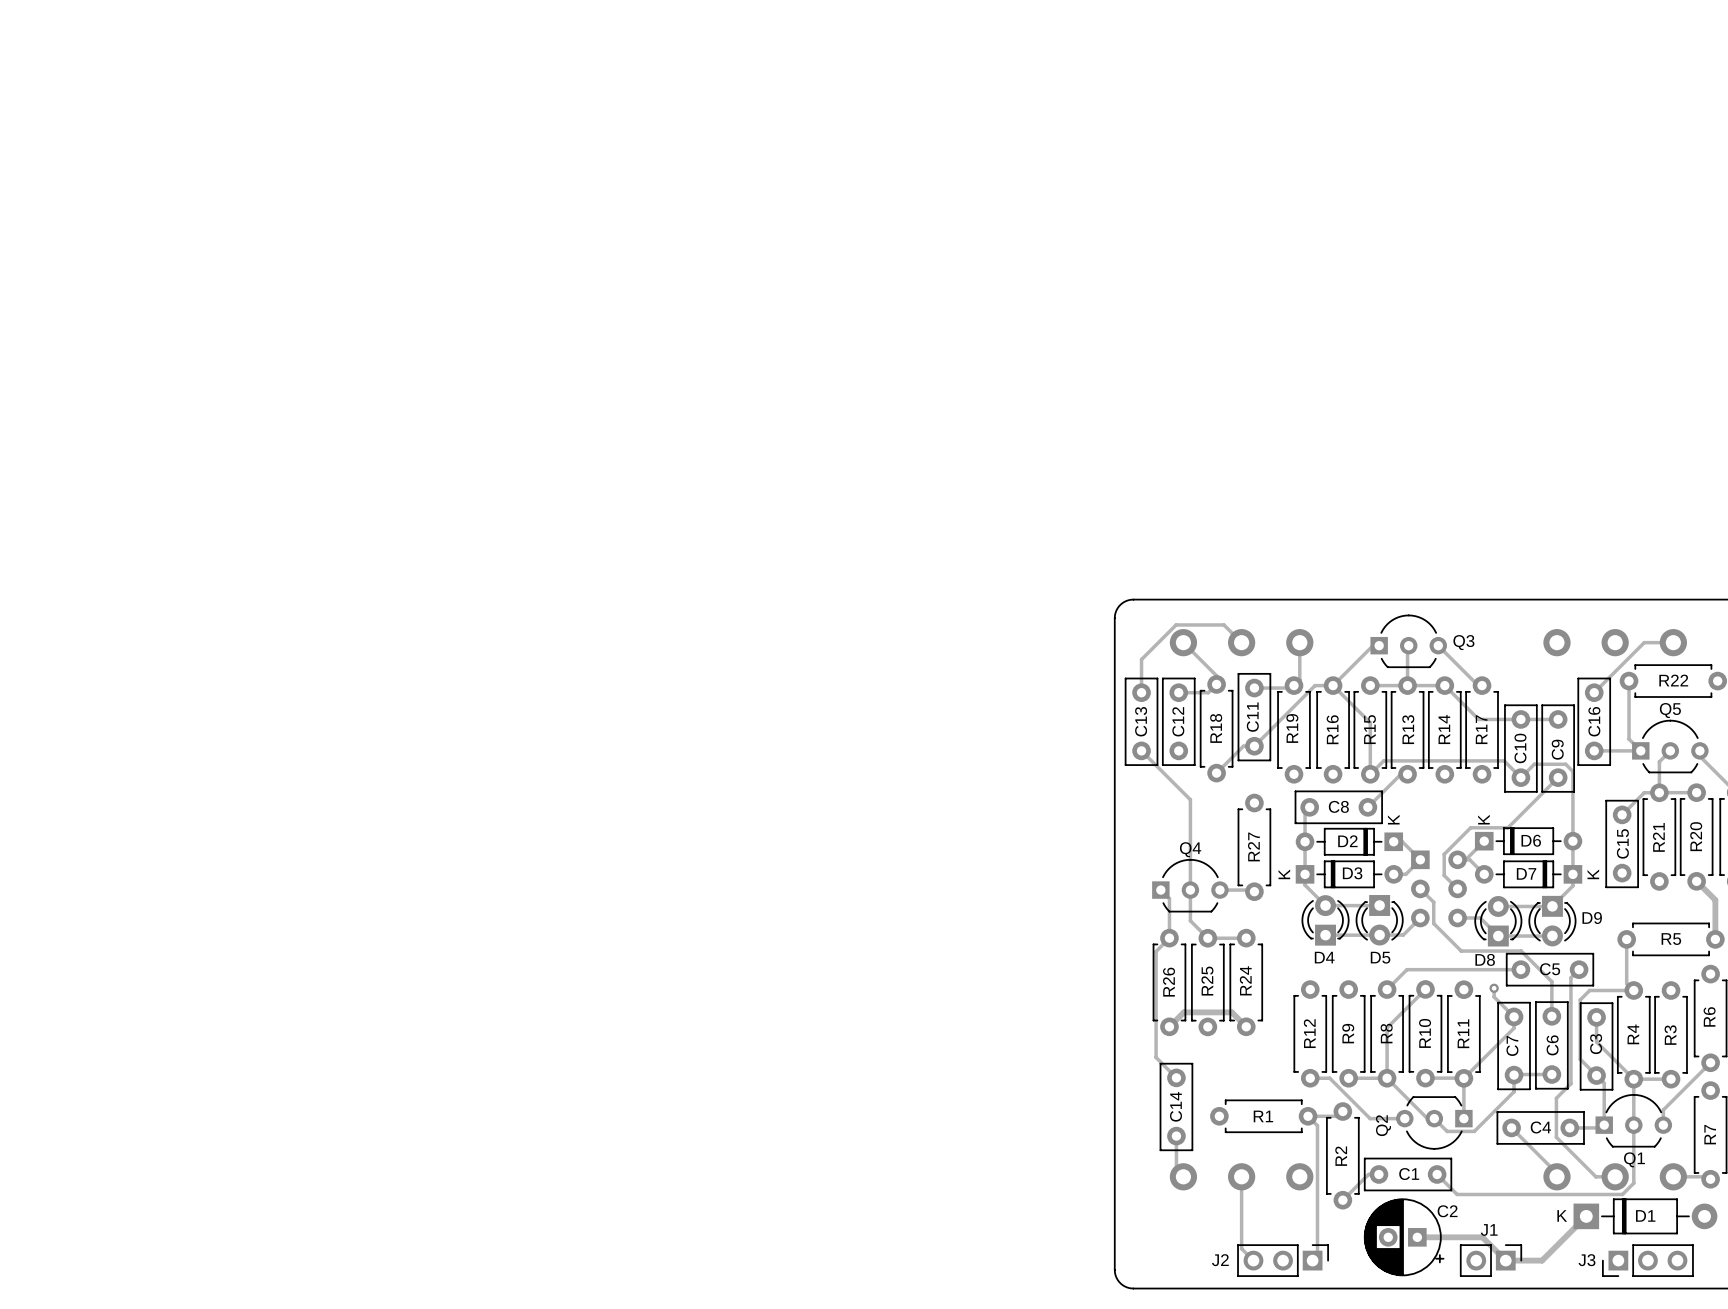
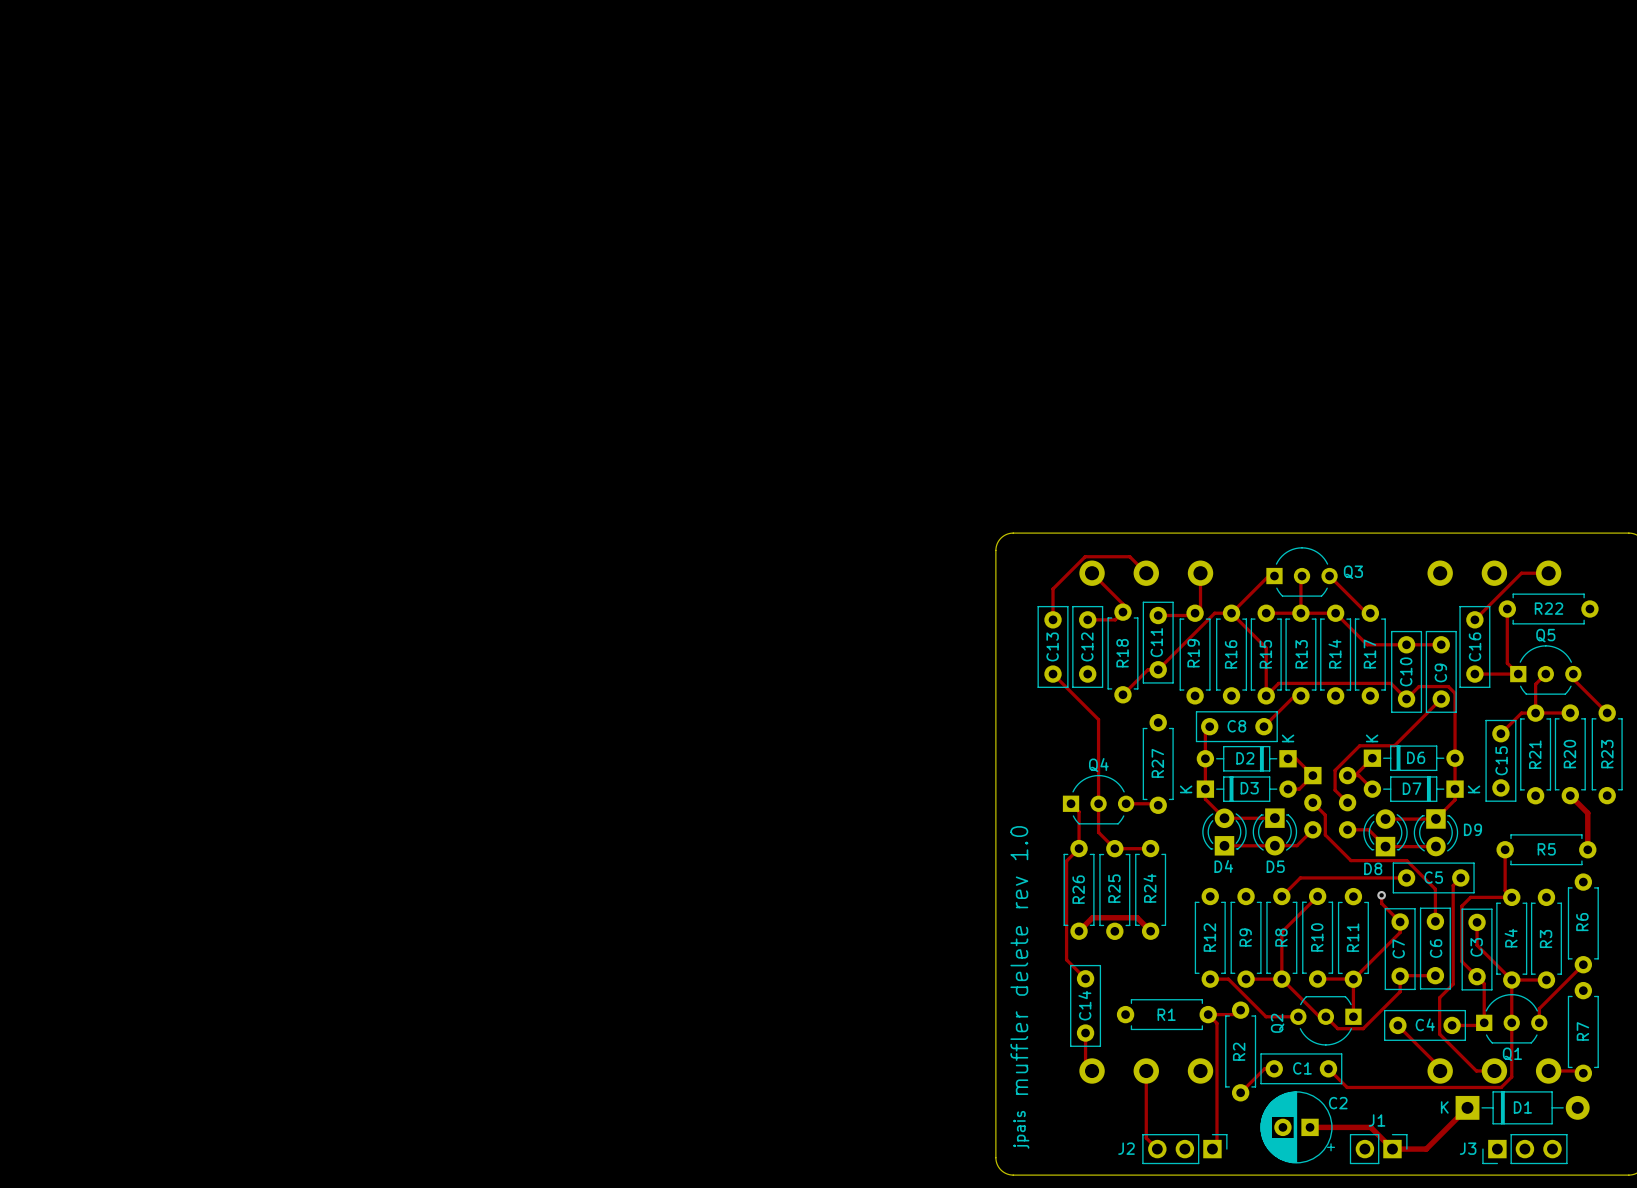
board edge: (1133, 599) (1120, 605) (1114, 618) (1114, 1269) (1120, 1283) (1133, 1288) -> (1045, 533) (1007, 534) (998, 541) (995, 550) (995, 1159) (999, 1168) (1007, 1174) (1045, 1175)
text: none -> muffler delete rev 1.0 (1019, 960)
text: none -> jpais (1021, 1129)

